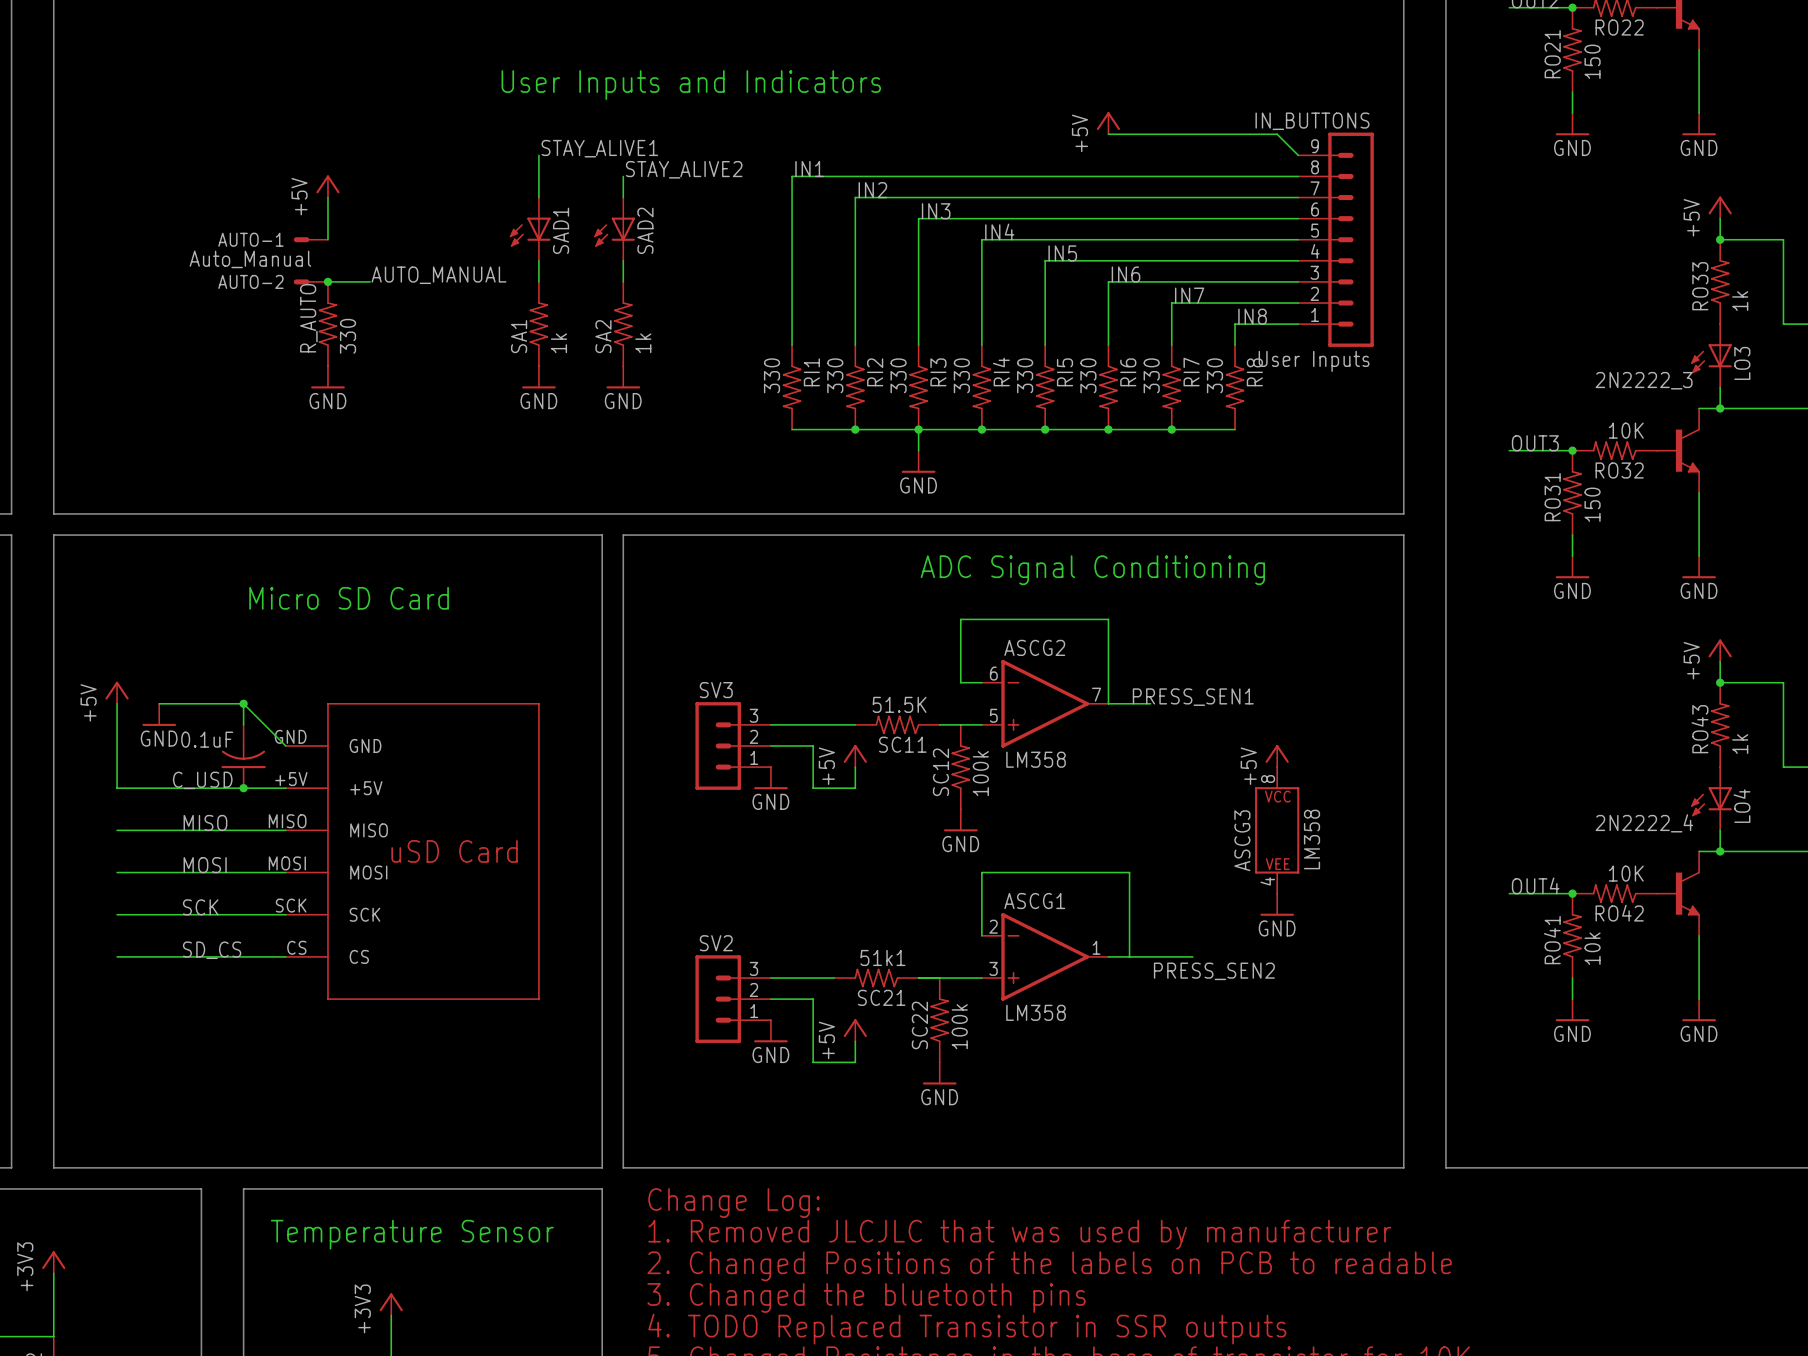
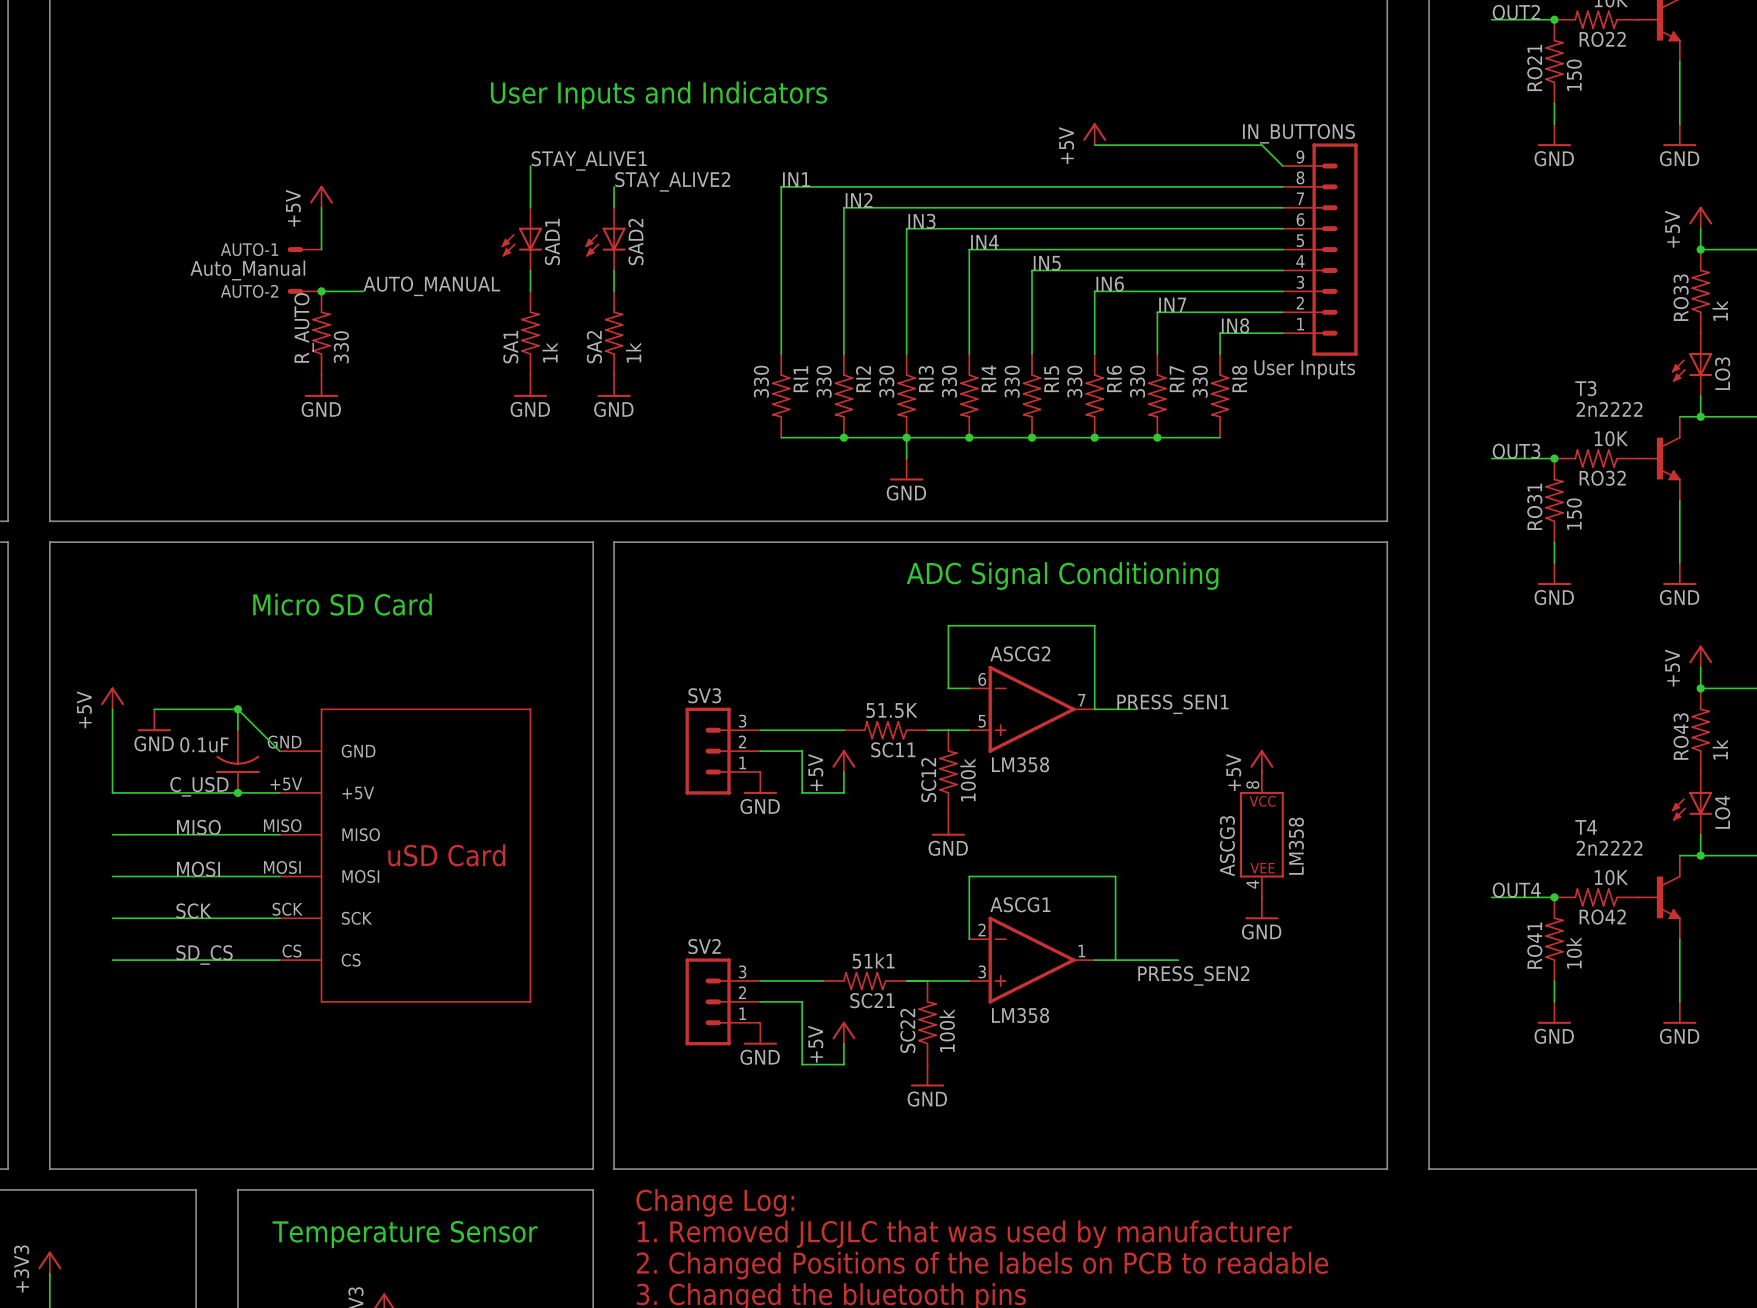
2N2222_3 name: 2N2222_3 (1644, 380) -> T3 (1585, 388)
2N2222_3 value: none -> 2n2222 (1609, 409)
2N2222_4 name: 2N2222_4 (1644, 823) -> T4 (1586, 827)
2N2222_4 value: none -> 2n2222 (1609, 848)

